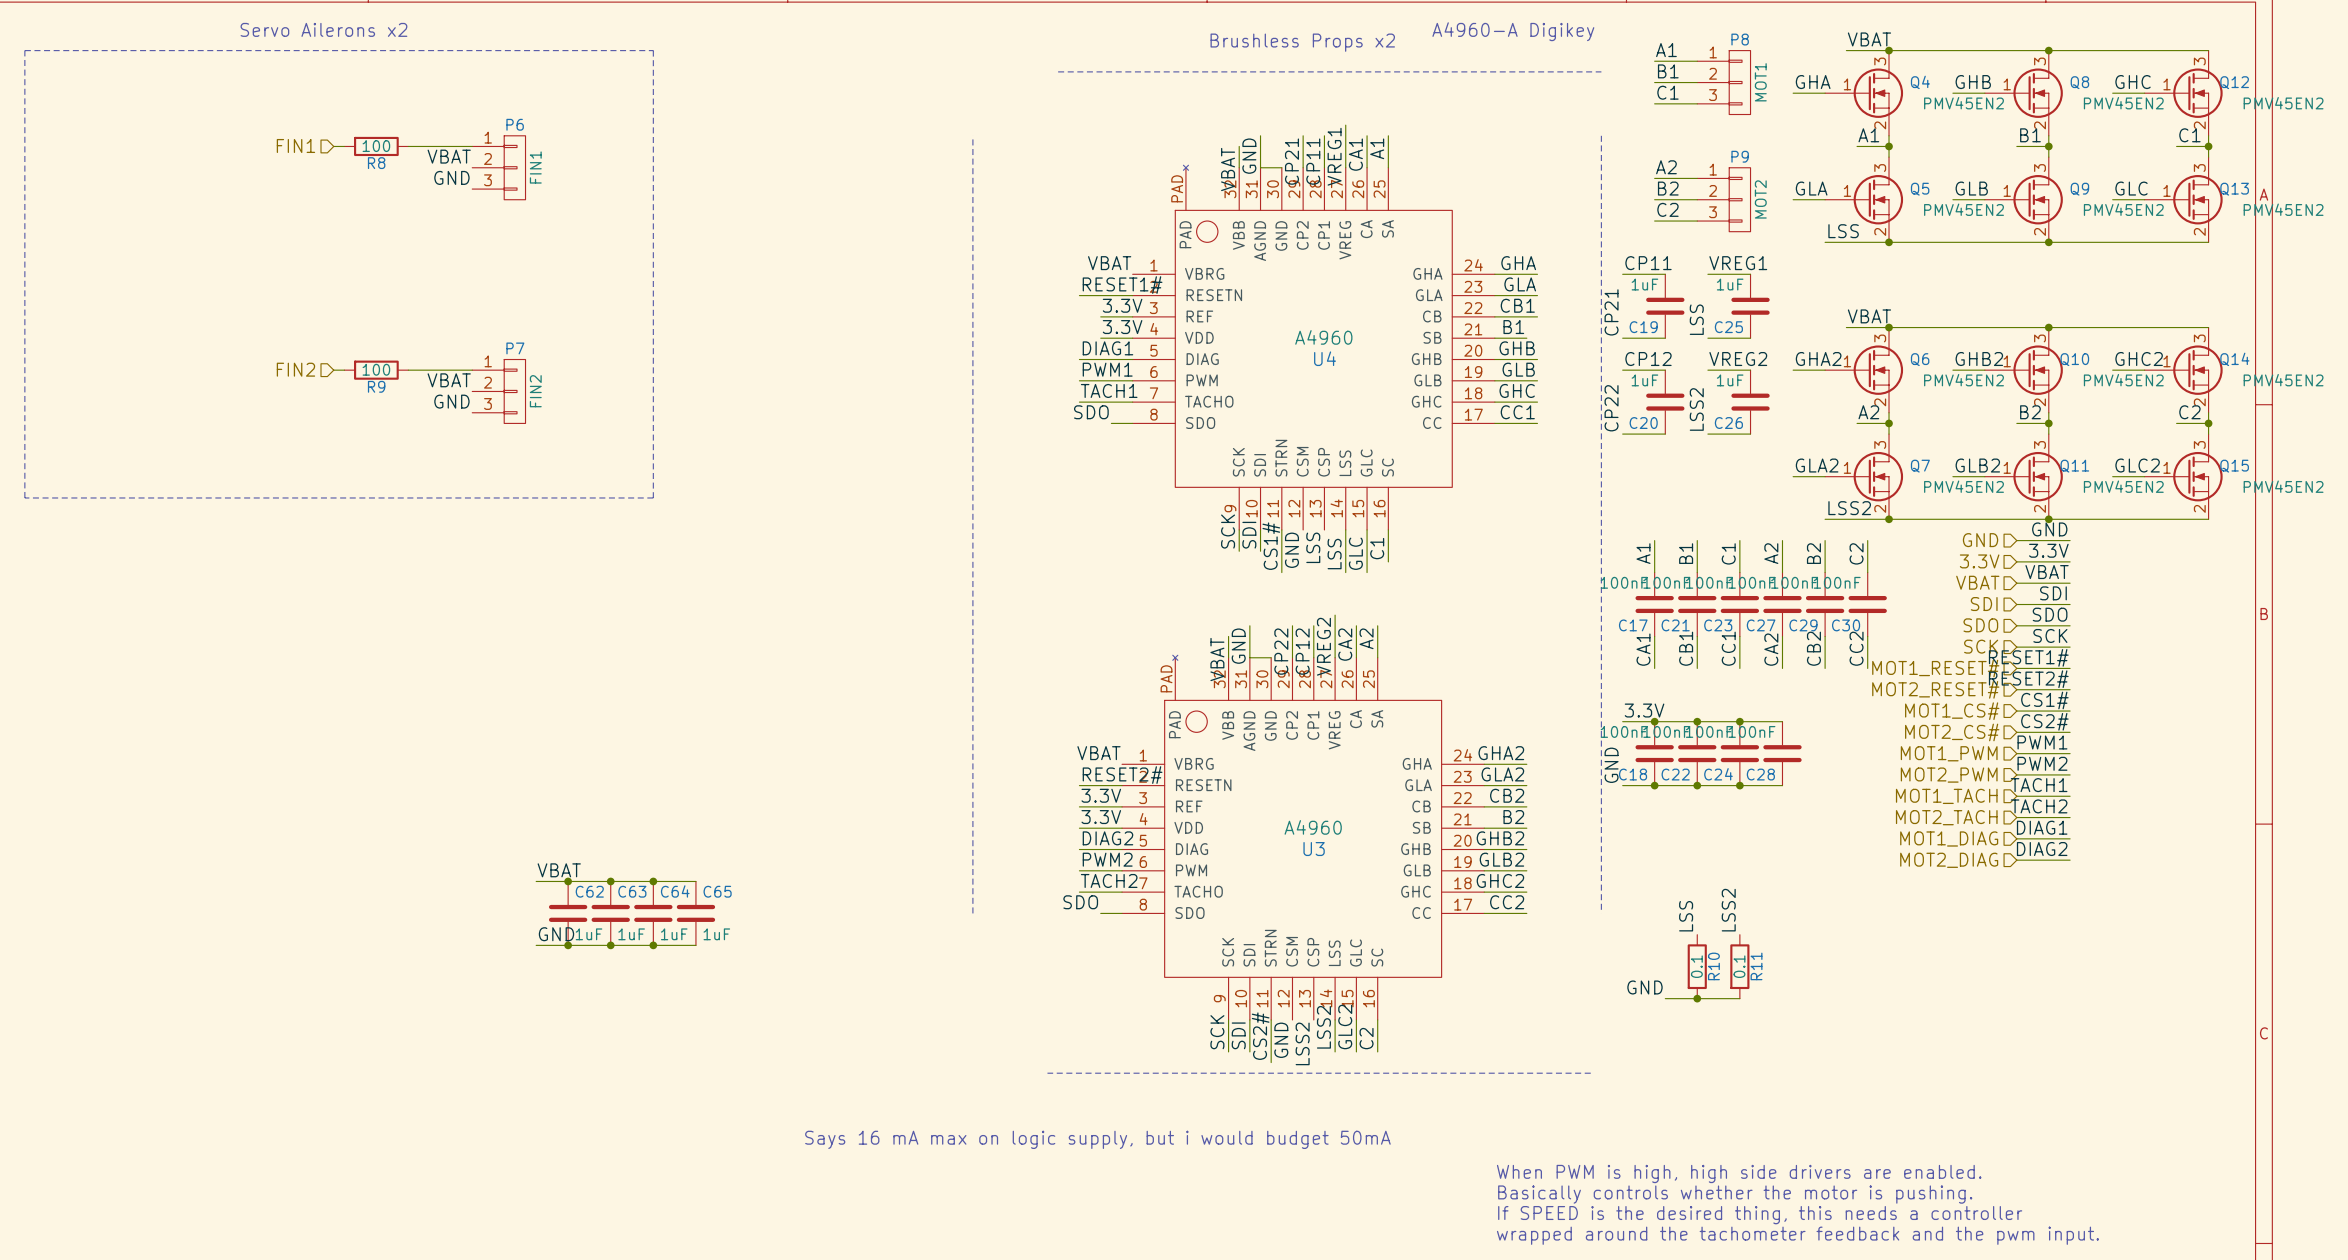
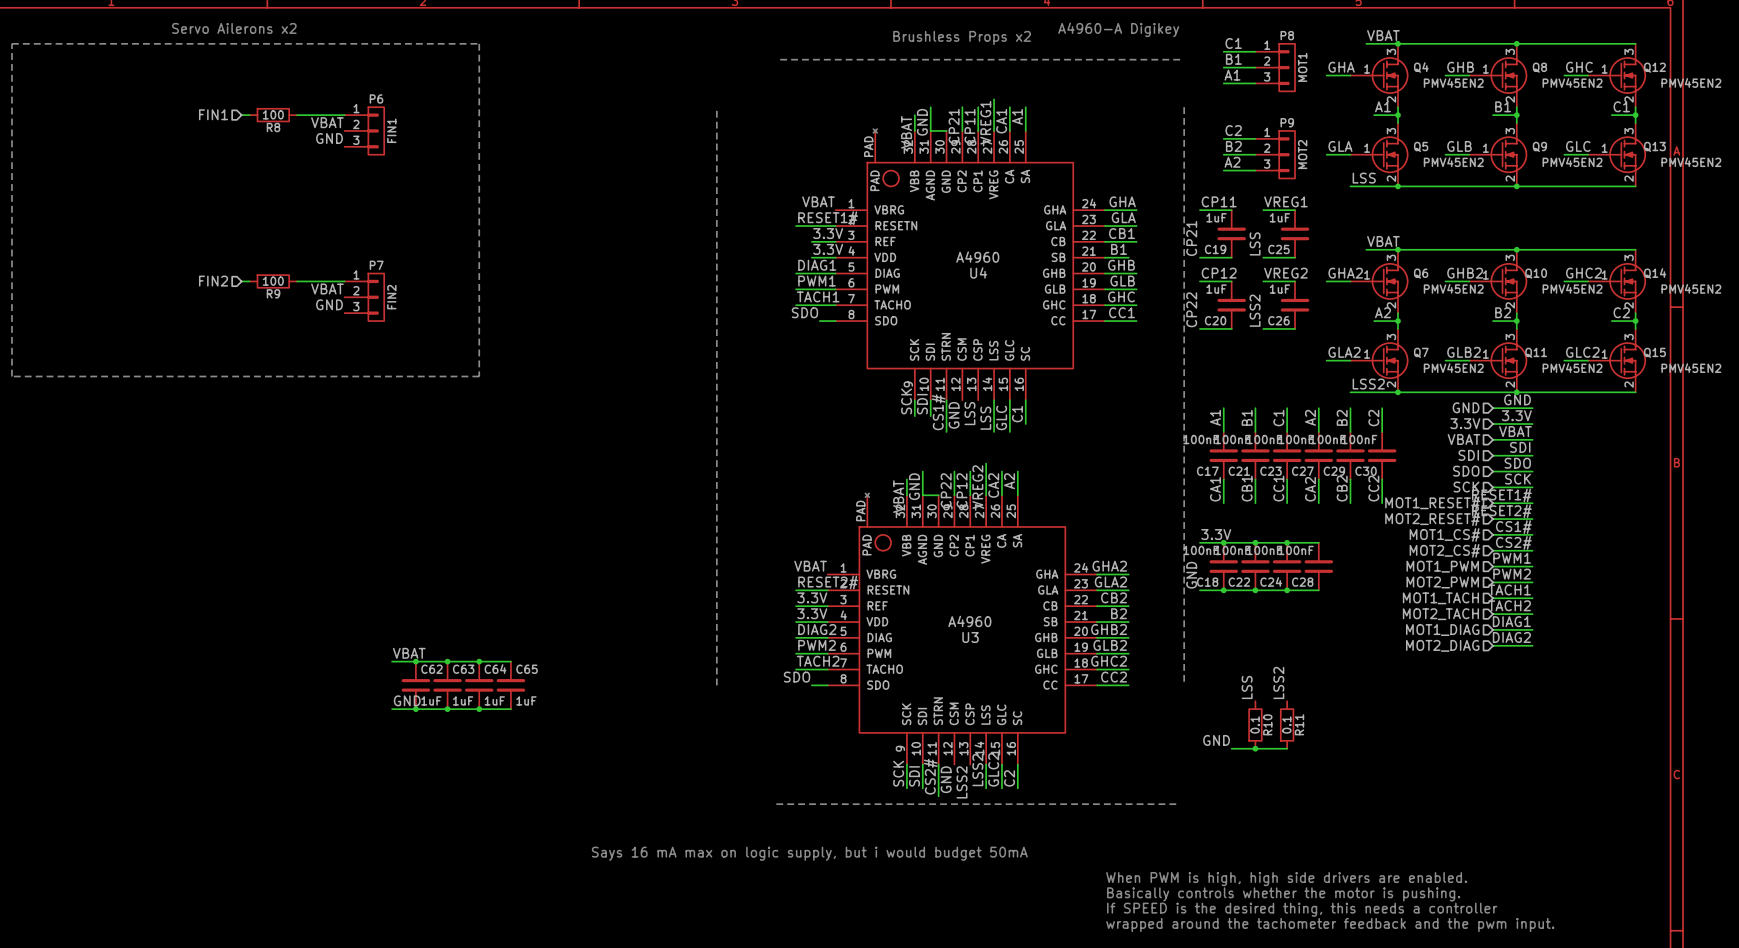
label: A1 (1666, 50) -> C1 (1233, 43)
label: C1 (1667, 92) -> A1 (1232, 75)
label: A2 (1666, 167) -> C2 (1233, 130)
label: C2 (1667, 209) -> A2 (1232, 162)

